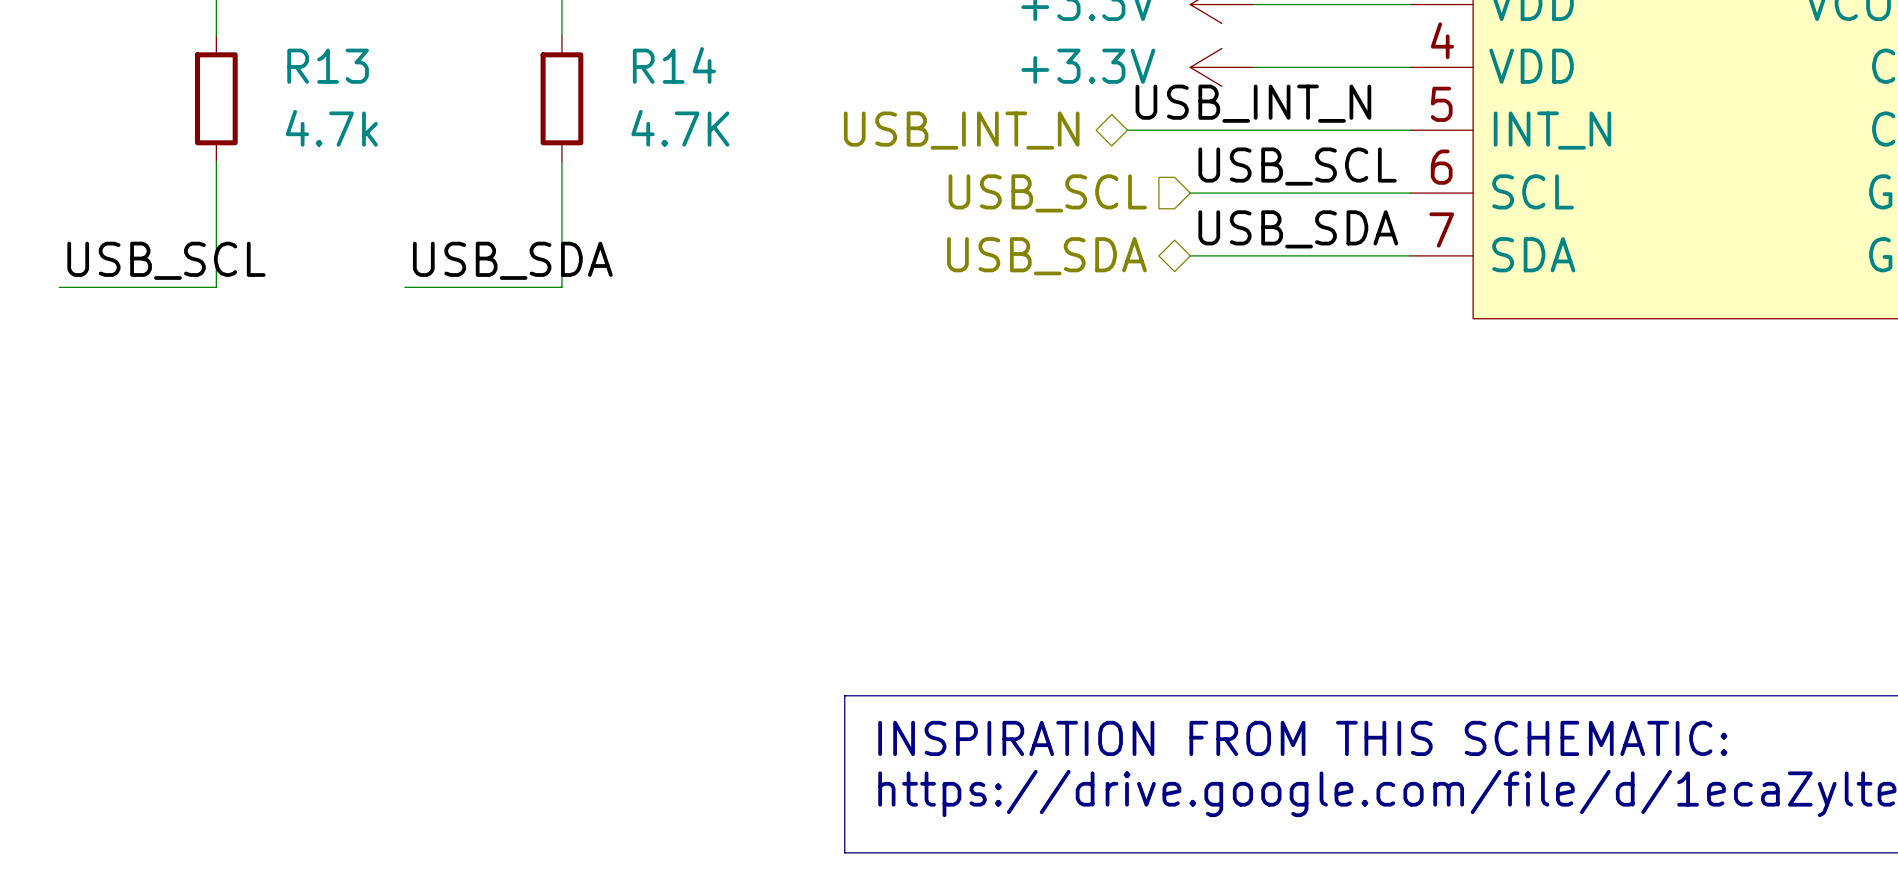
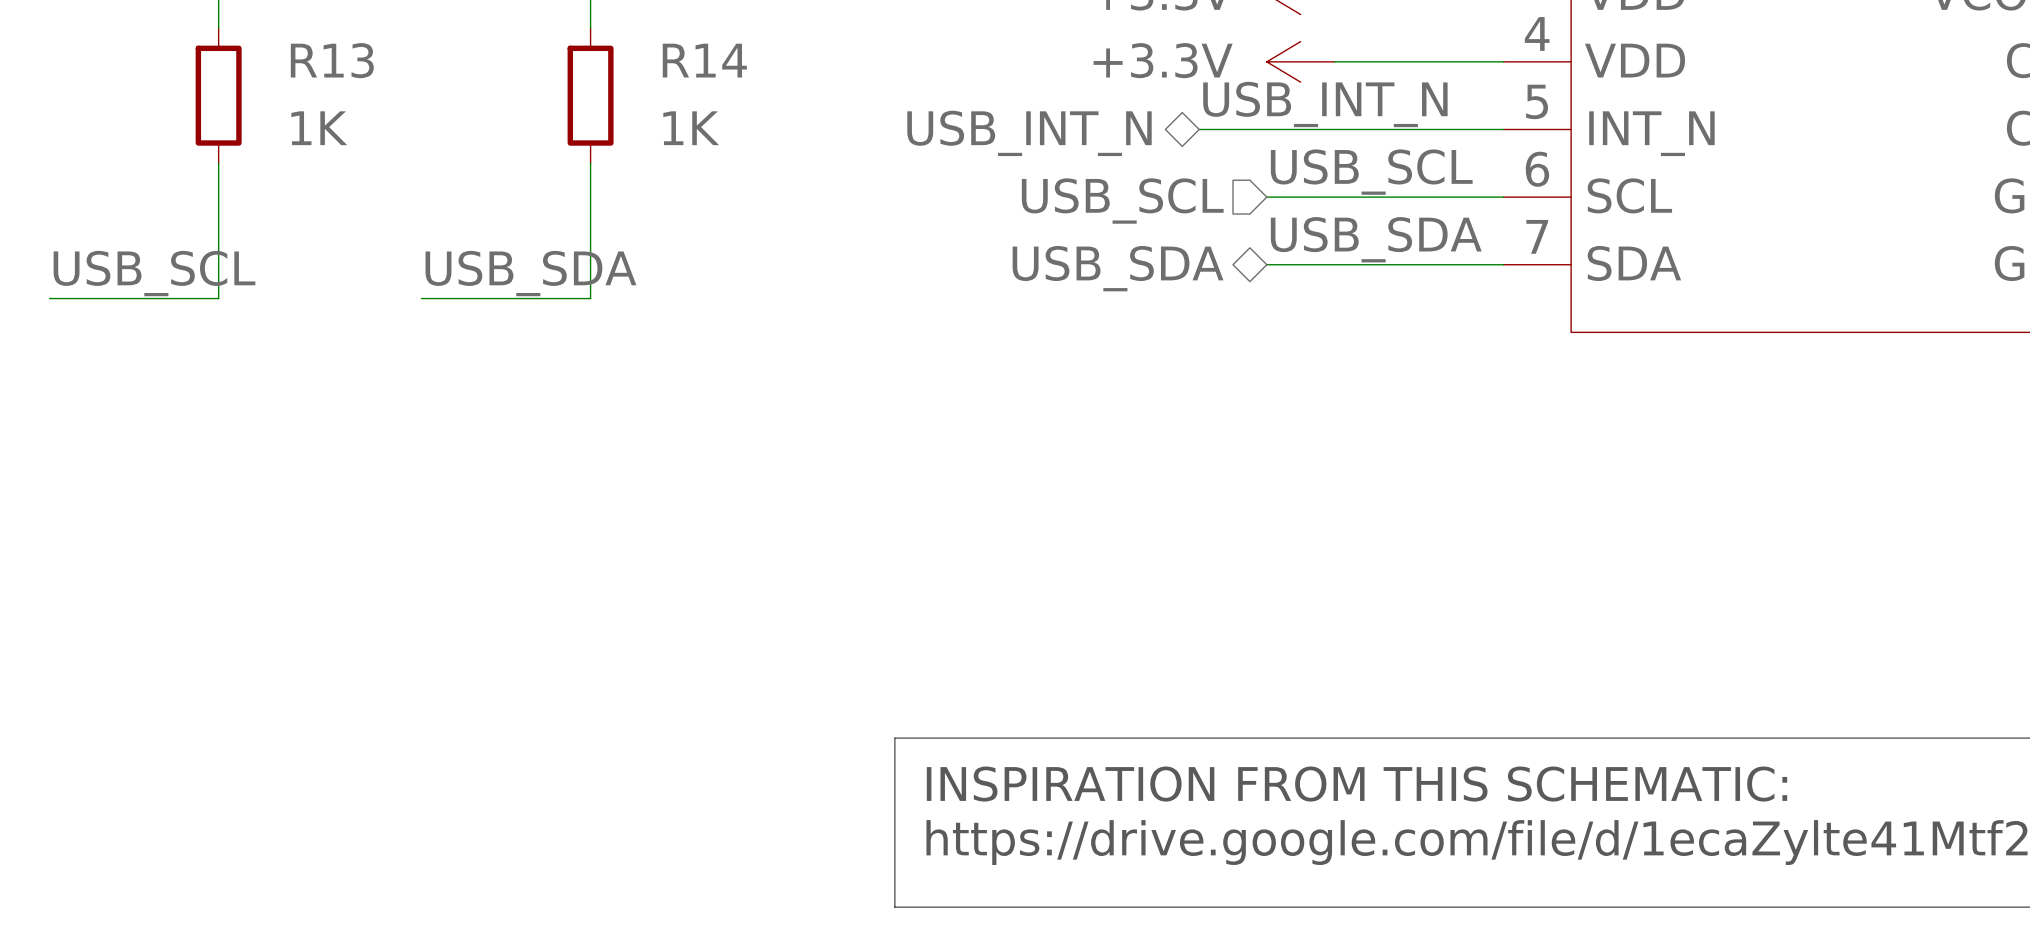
R13 value: 4.7k (331, 128) -> 1K (319, 128)
R14 value: 4.7K (680, 128) -> 1K (691, 128)

